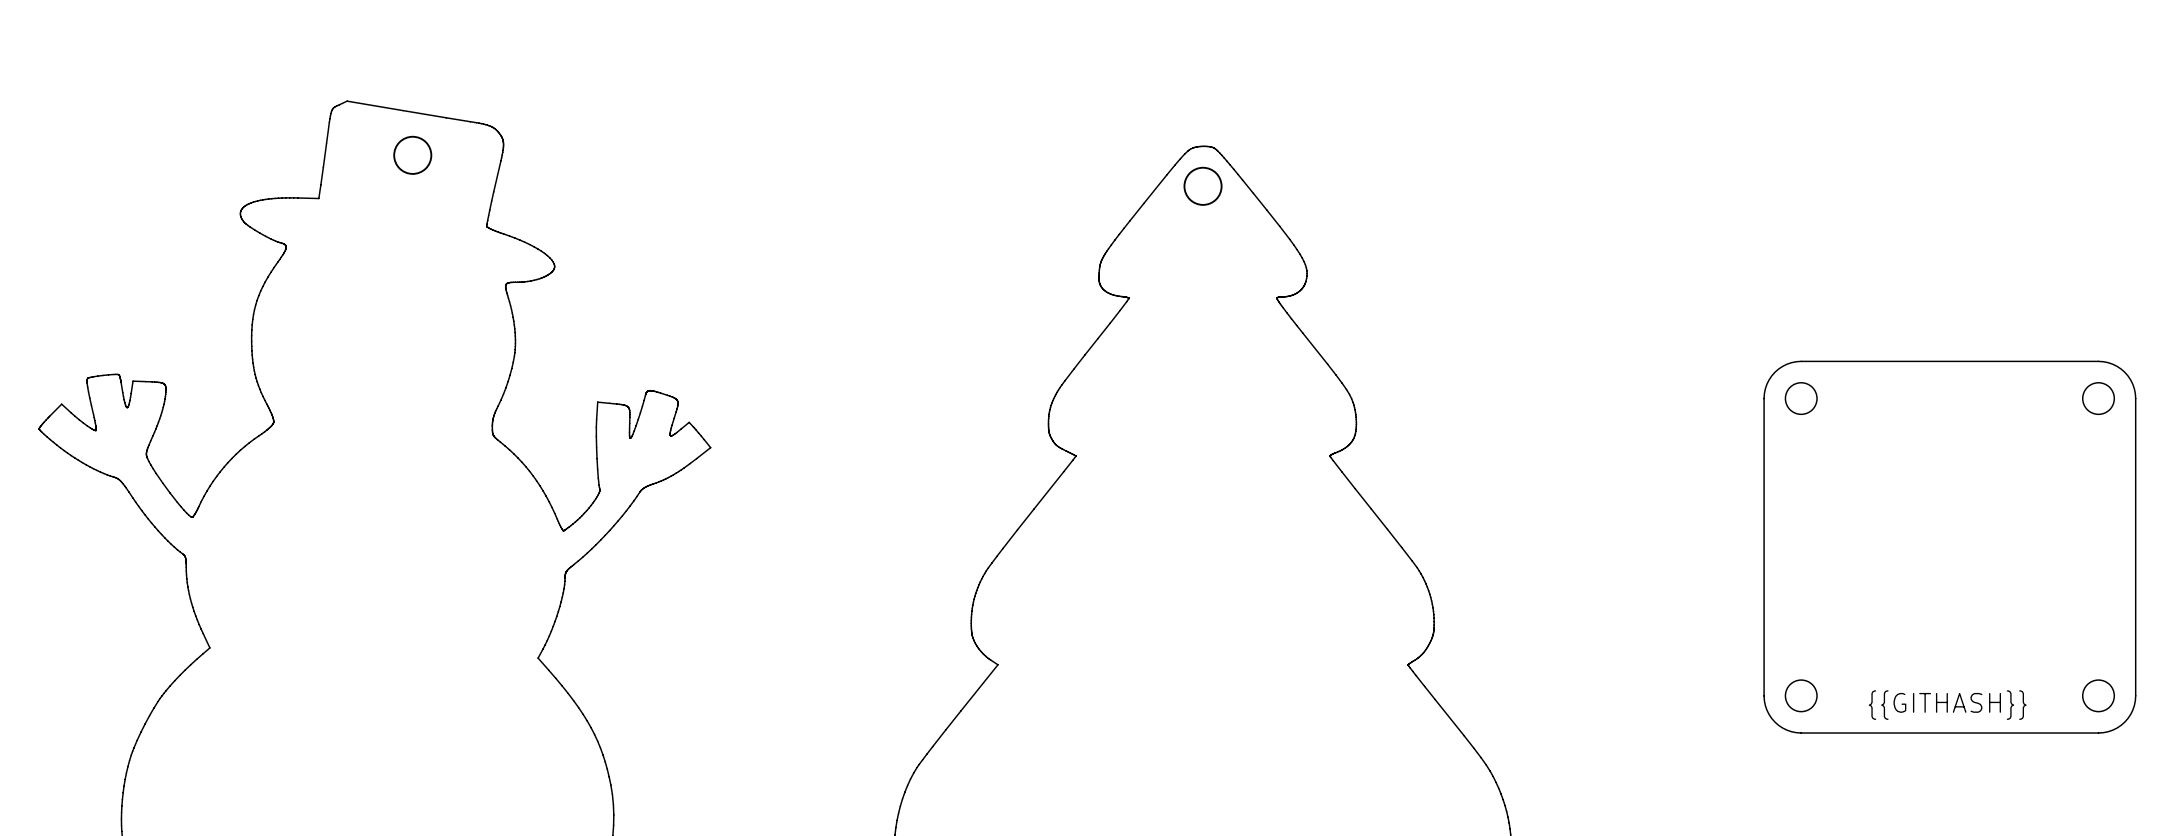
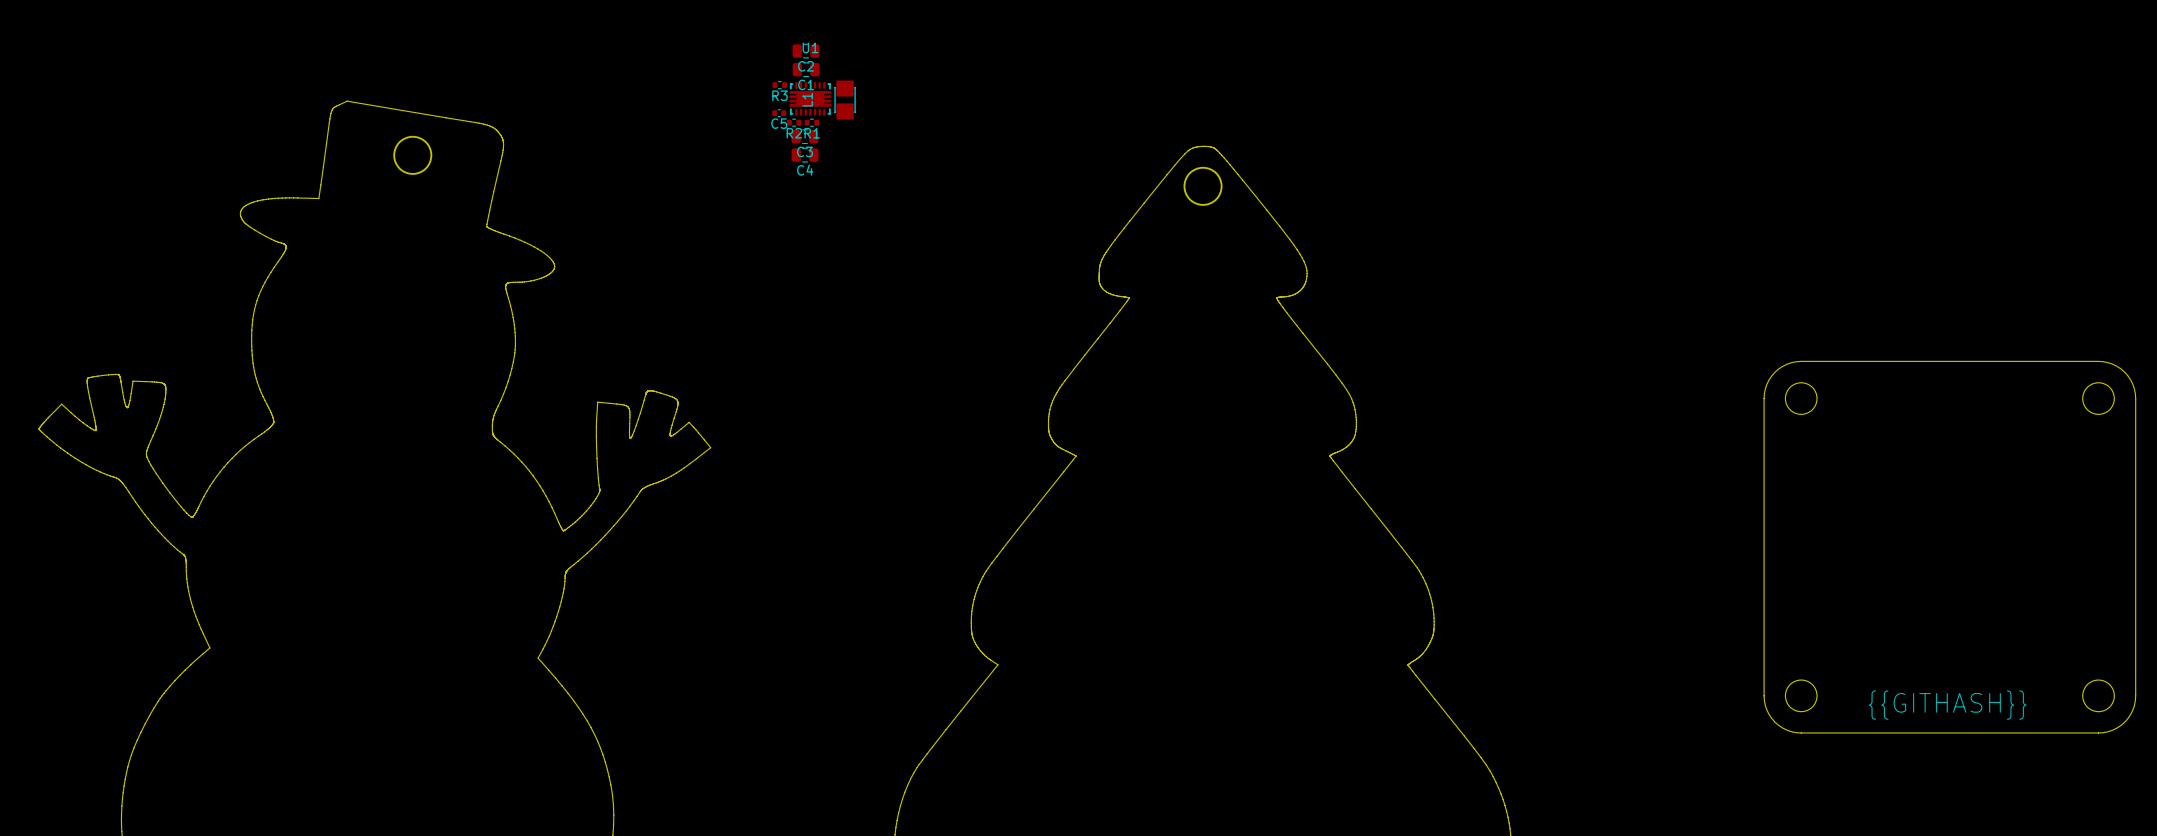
C2: none -> (806, 51)
C1: none -> (806, 69)
R3: none -> (779, 85)
L1: none -> (845, 99)
U1: none -> (810, 100)
C5: none -> (779, 113)
R2: none -> (794, 122)
R1: none -> (811, 122)
C3: none -> (804, 136)
C4: none -> (805, 155)

